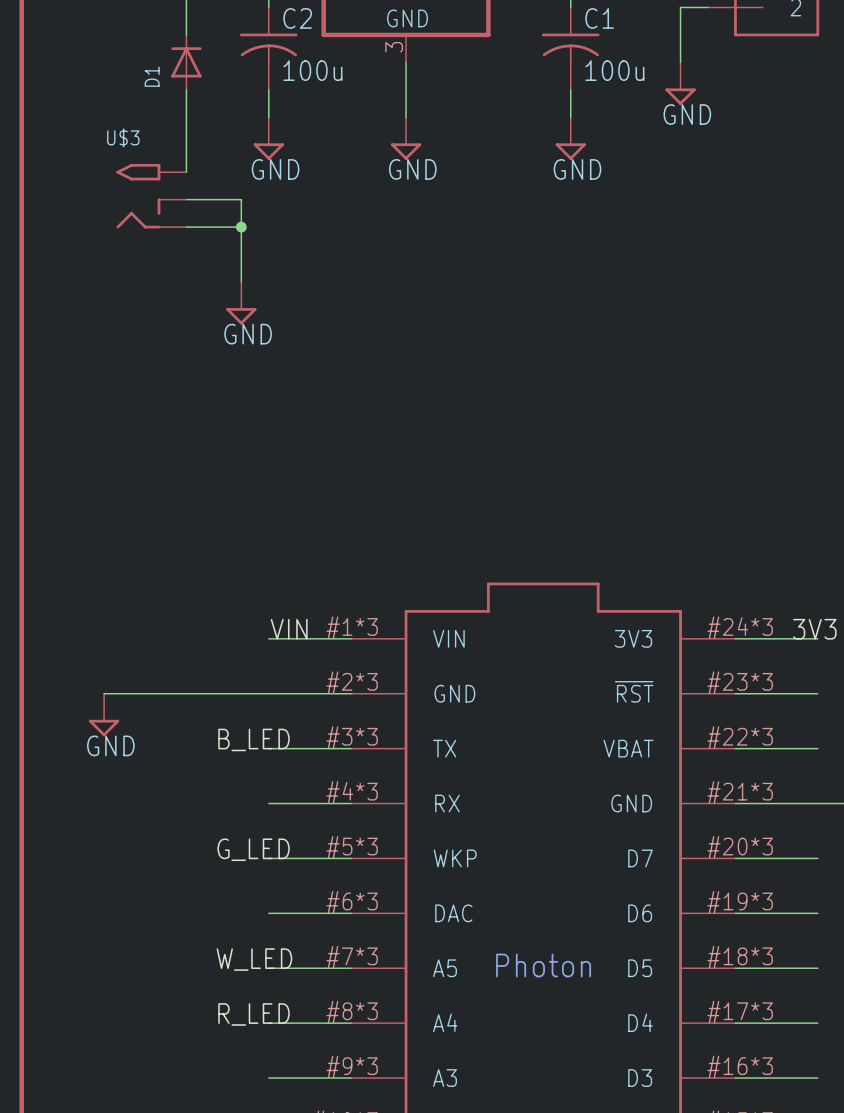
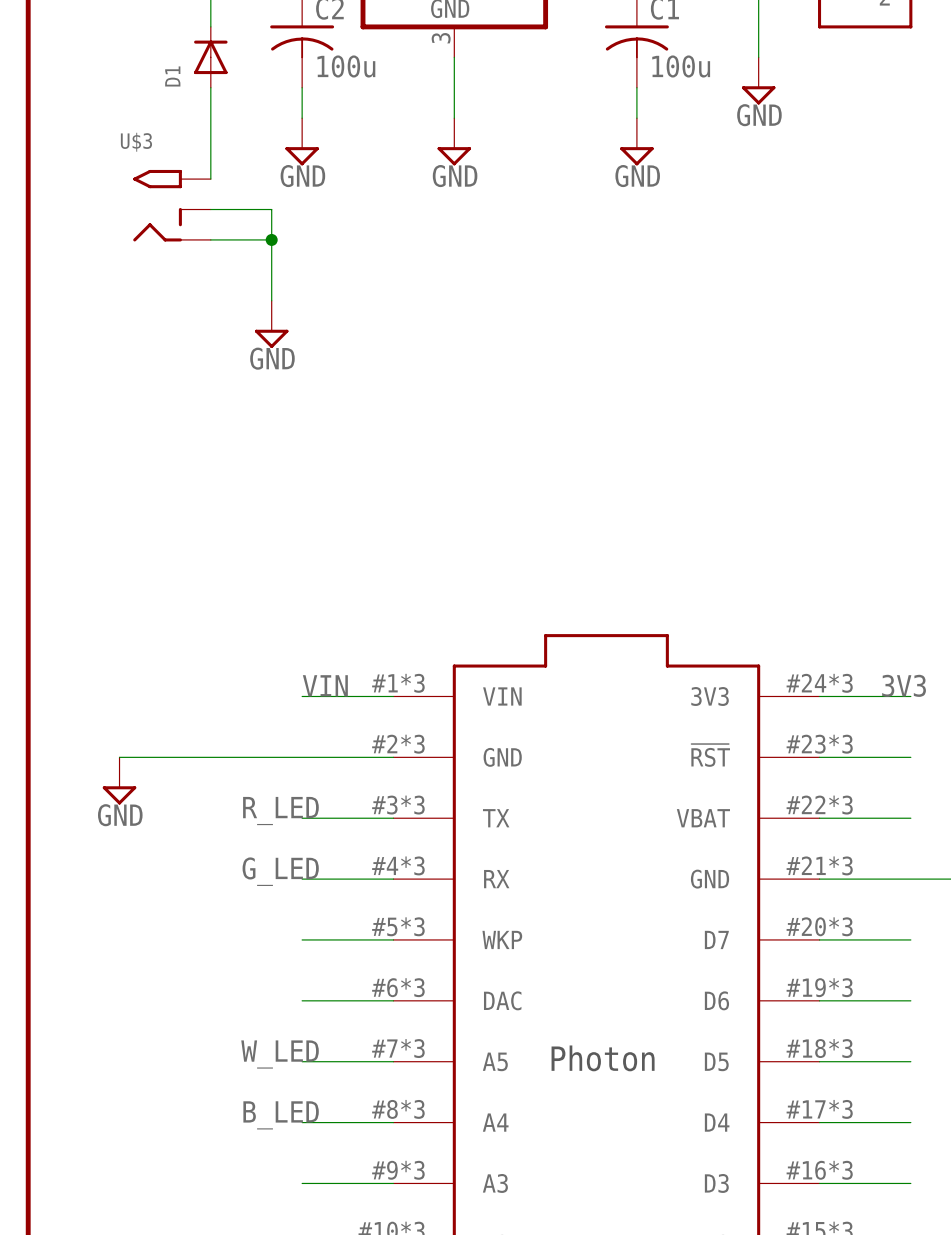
label: B_LED (254, 739) -> R_LED (280, 811)
label position: G_LED (253, 849) -> G_LED (280, 871)
label: R_LED (254, 1014) -> B_LED (281, 1115)

